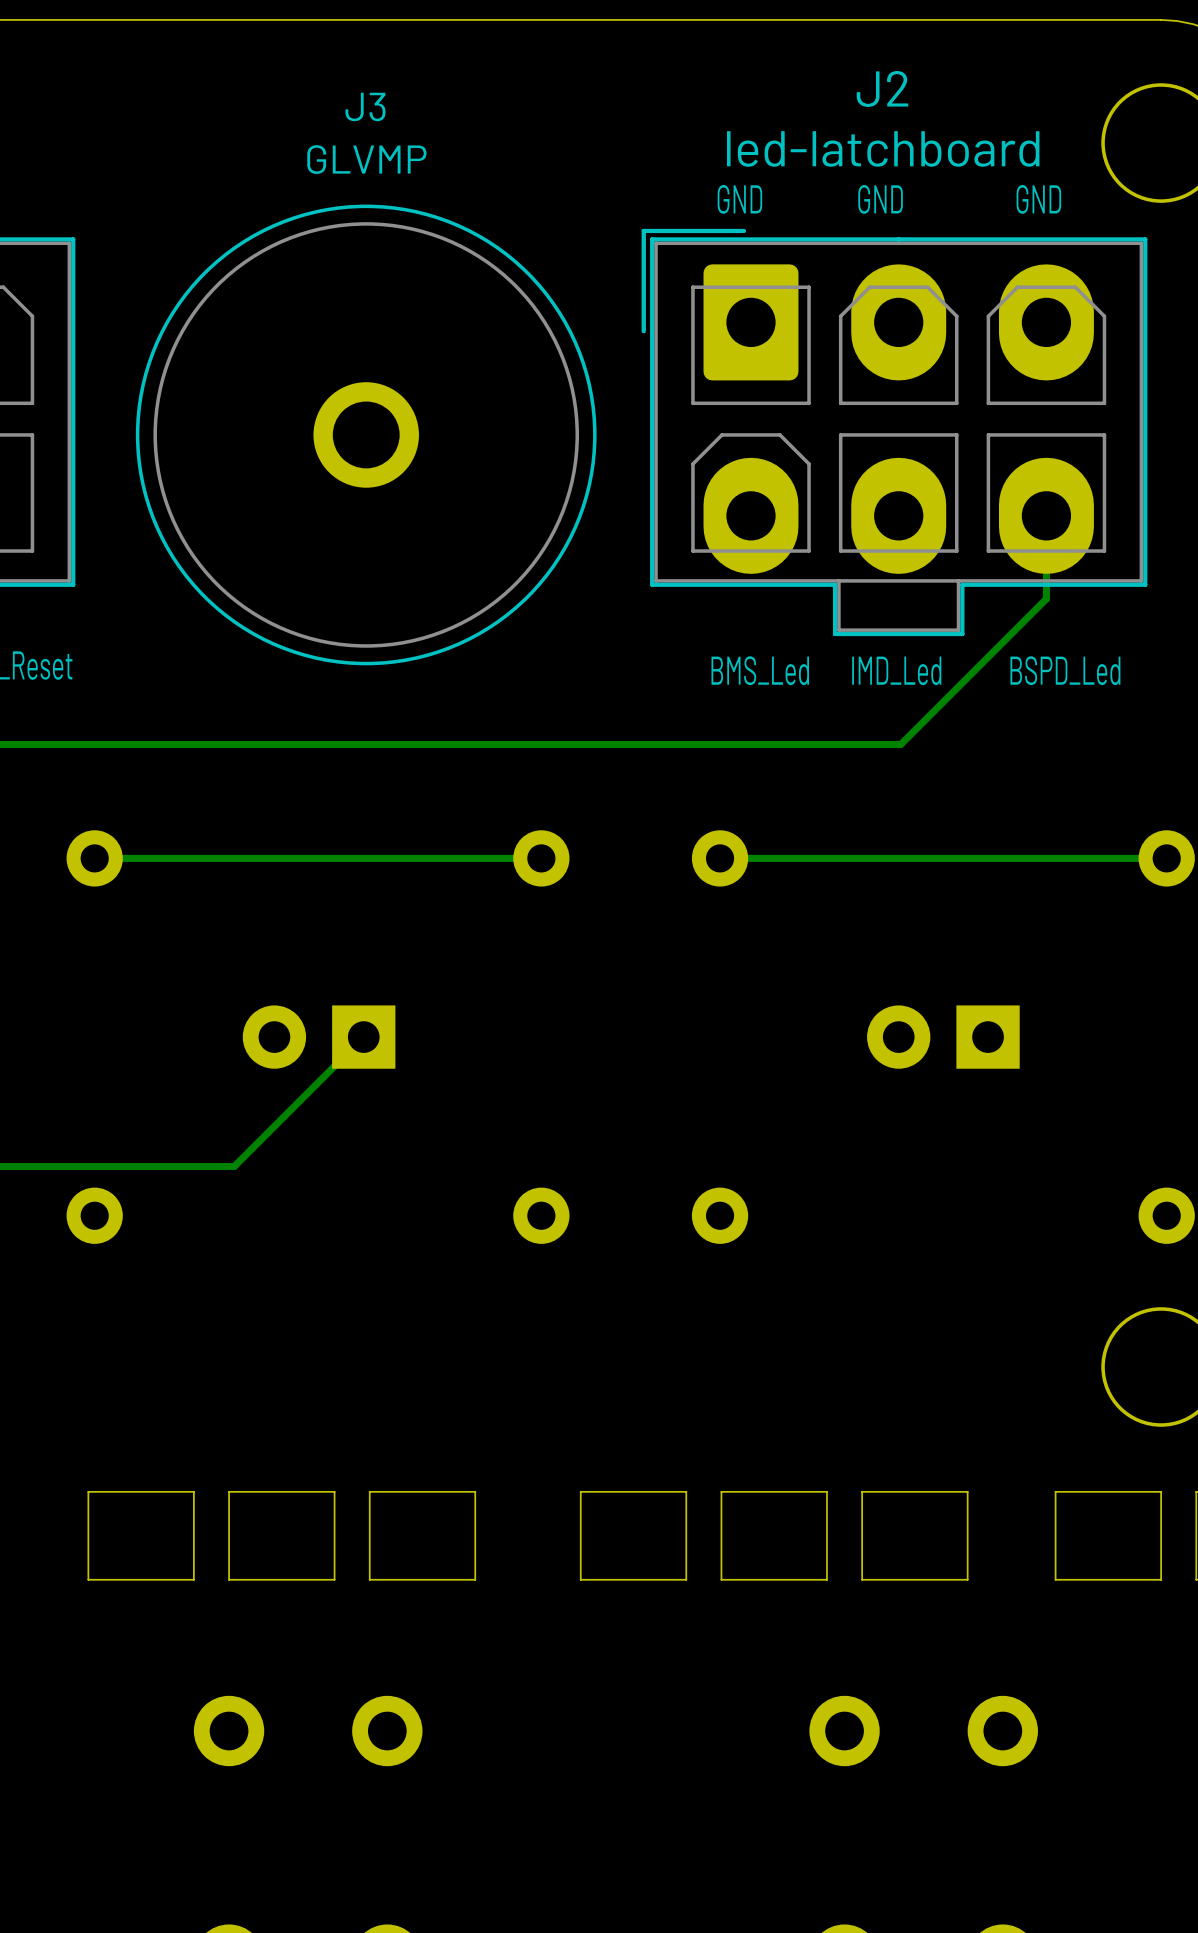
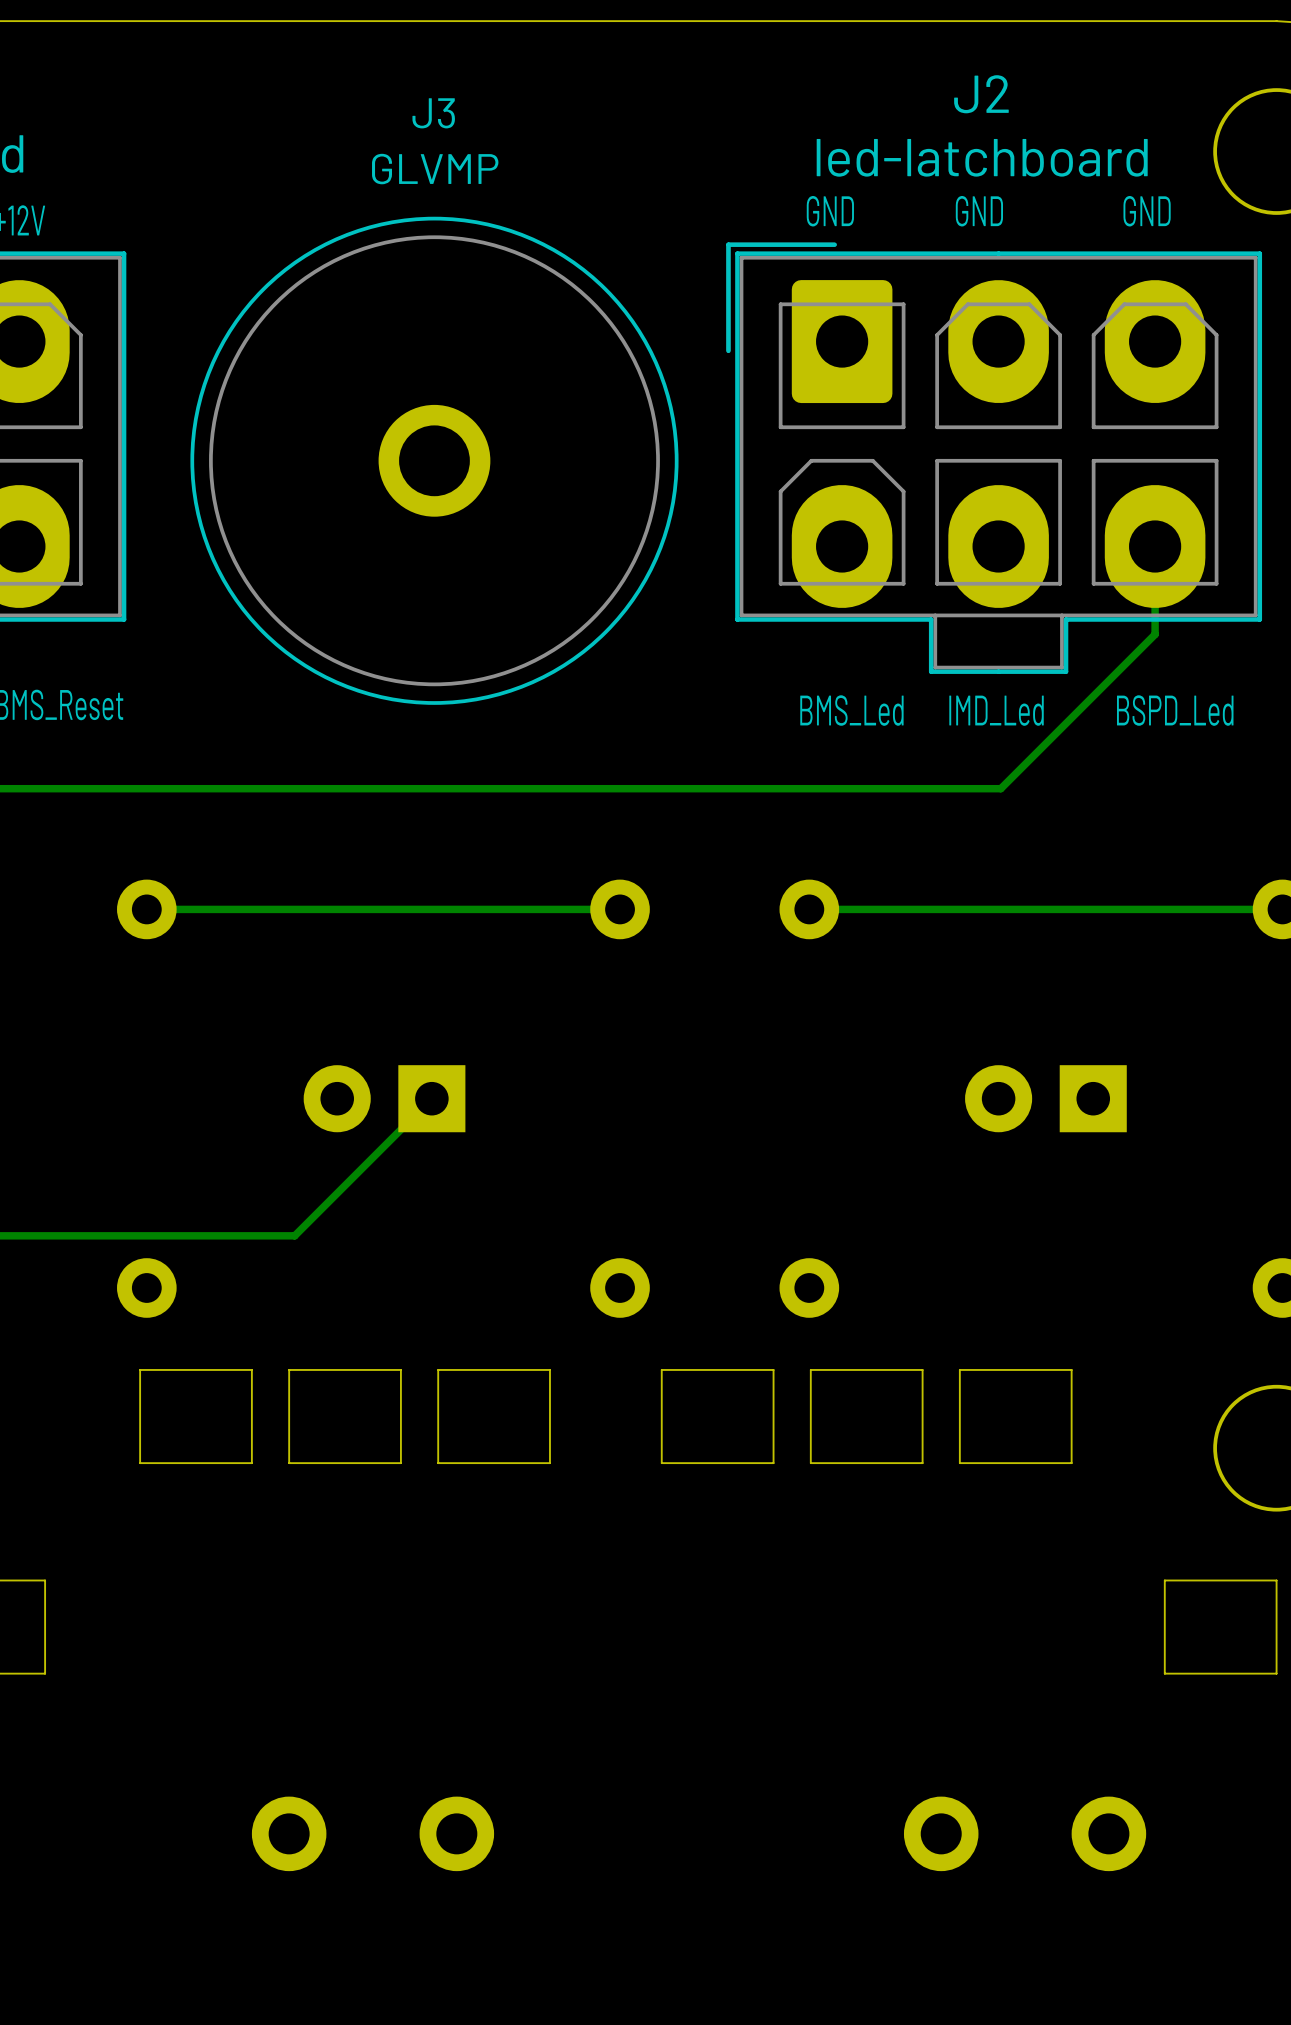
board edge: (193, 1491) (88, 1491) (88, 1579) (193, 1579) (193, 1491) -> (251, 1369) (140, 1369) (140, 1463) (251, 1463) (251, 1369)
board edge: (334, 1491) (229, 1491) (229, 1579) (334, 1579) (334, 1491) -> (400, 1369) (289, 1369) (289, 1463) (400, 1463) (400, 1369)
board edge: (475, 1491) (369, 1491) (369, 1579) (475, 1579) (475, 1491) -> (549, 1369) (438, 1369) (438, 1463) (549, 1463) (549, 1369)
board edge: (686, 1491) (580, 1491) (580, 1579) (686, 1579) (686, 1491) -> (773, 1369) (661, 1369) (661, 1463) (773, 1463) (773, 1369)
board edge: (826, 1491) (721, 1491) (721, 1579) (826, 1579) (826, 1491) -> (922, 1369) (810, 1369) (810, 1463) (922, 1463) (922, 1369)
board edge: (967, 1491) (862, 1491) (862, 1579) (967, 1579) (967, 1491) -> (1071, 1369) (959, 1369) (959, 1463) (1071, 1463) (1071, 1369)

